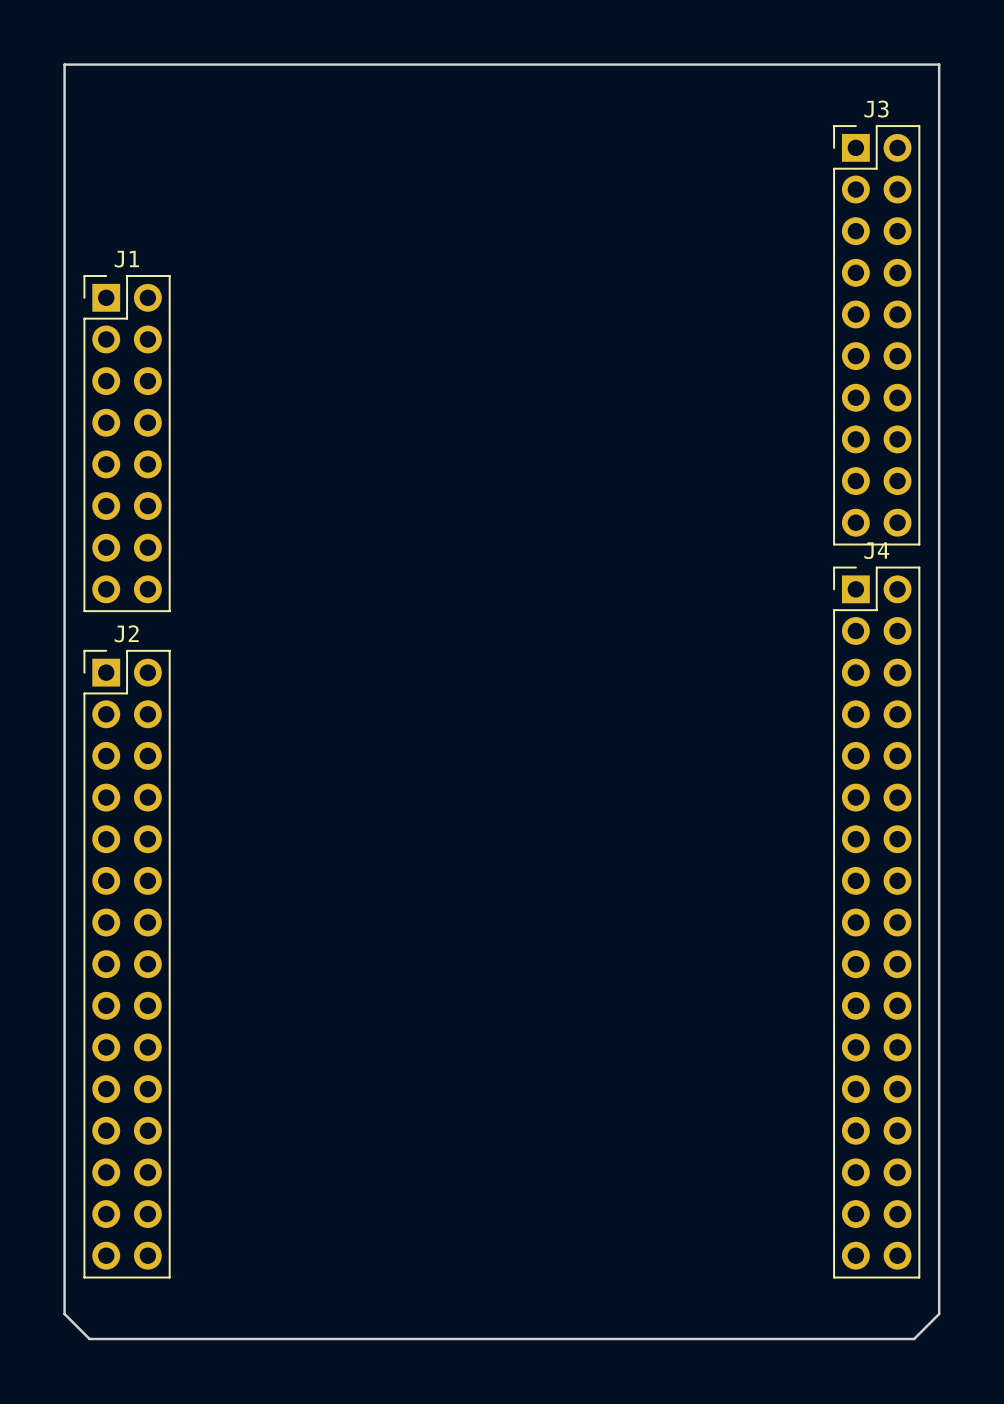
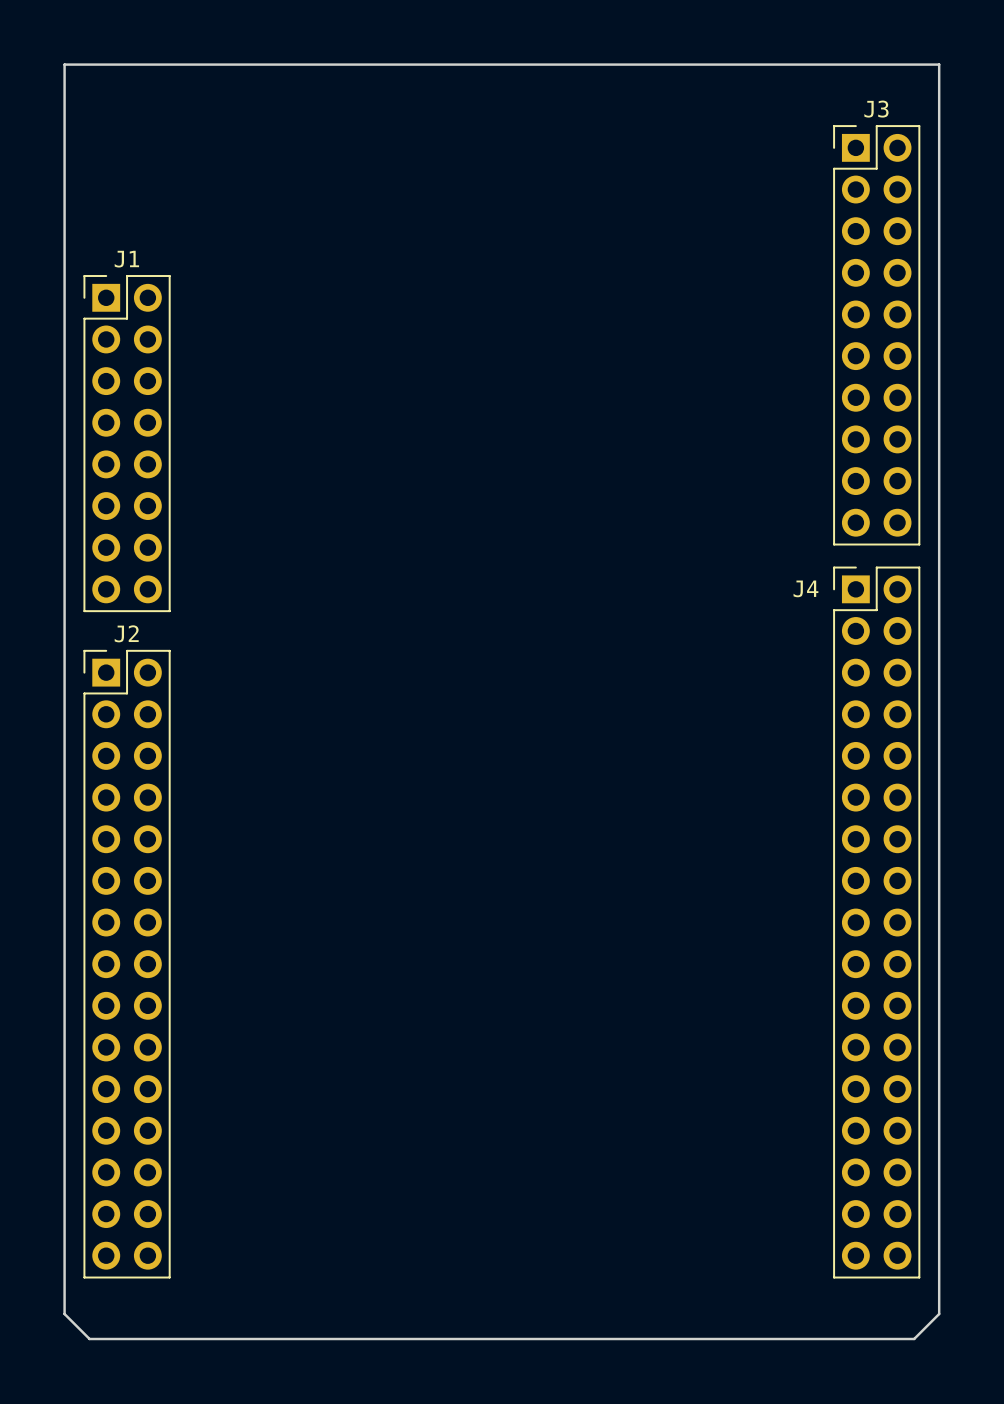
J4 name position: J4 (876, 550) -> J4 (805, 588)

